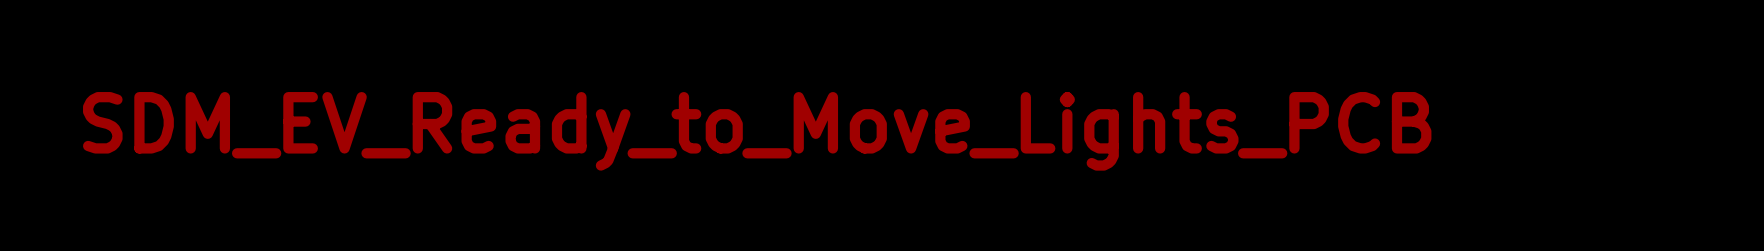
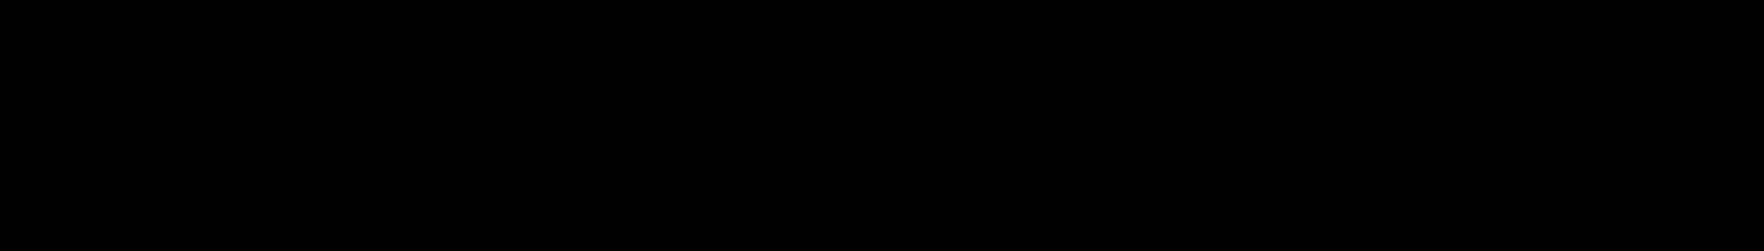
text: SDM_EV_Ready_to_Move_Lights_PCB (757, 131) -> none

